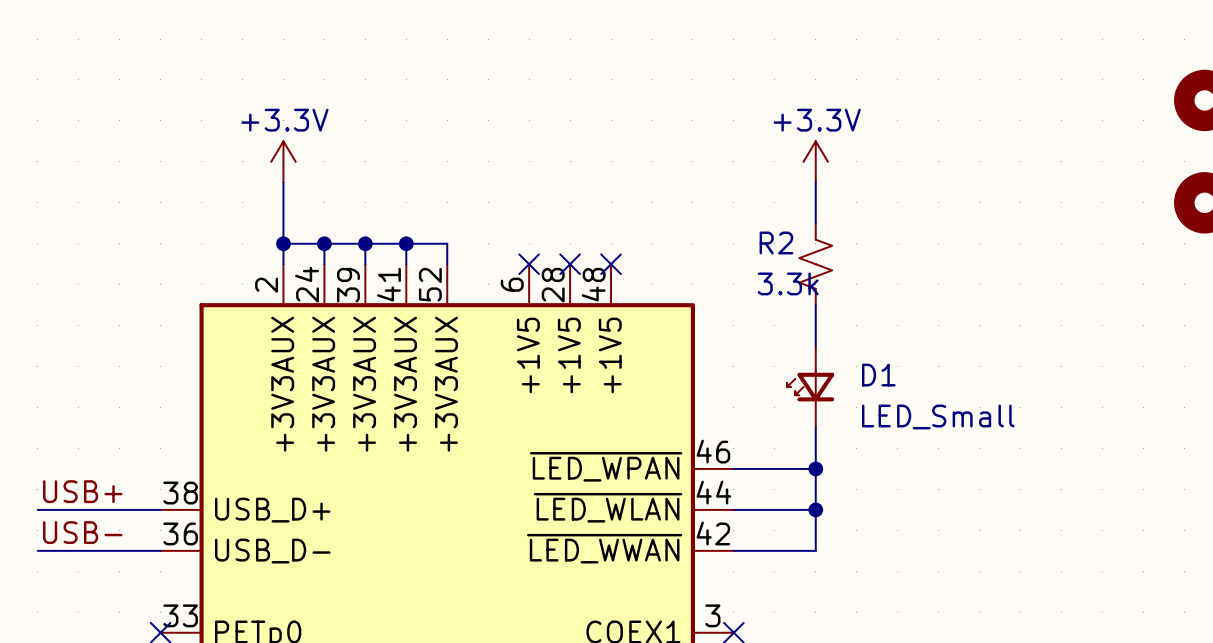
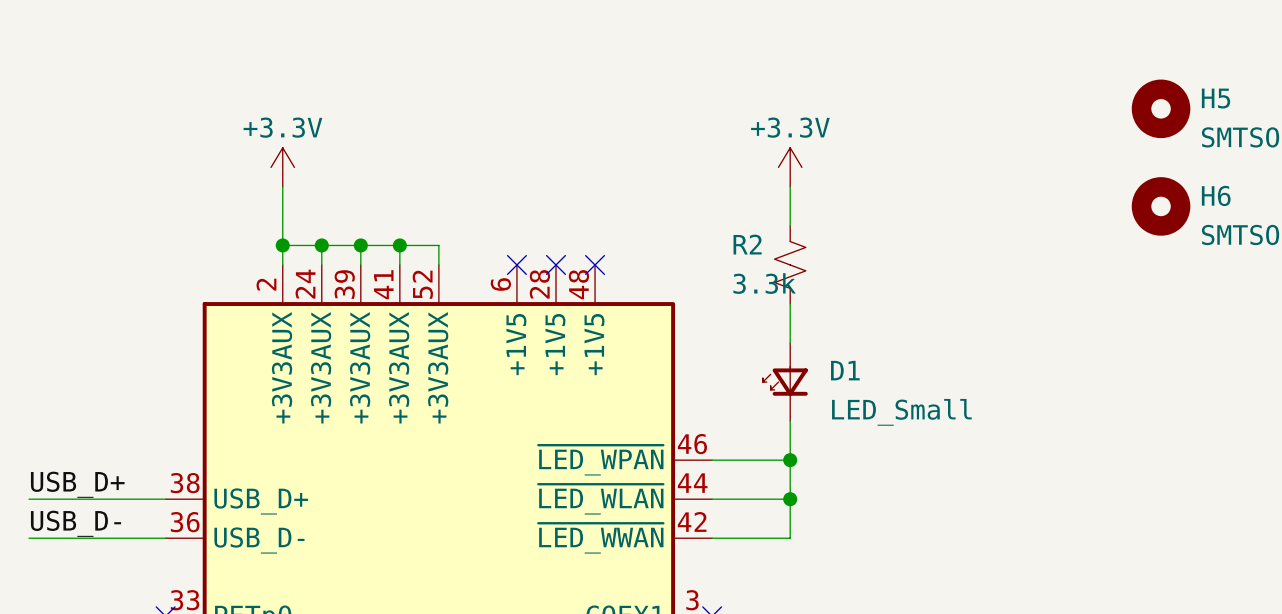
label: USB+ (82, 491) -> USB_D+ (77, 484)
wire: none -> (29, 499) (48, 499)
label: USB- (82, 532) -> USB_D- (76, 523)
wire: none -> (29, 538) (48, 538)

